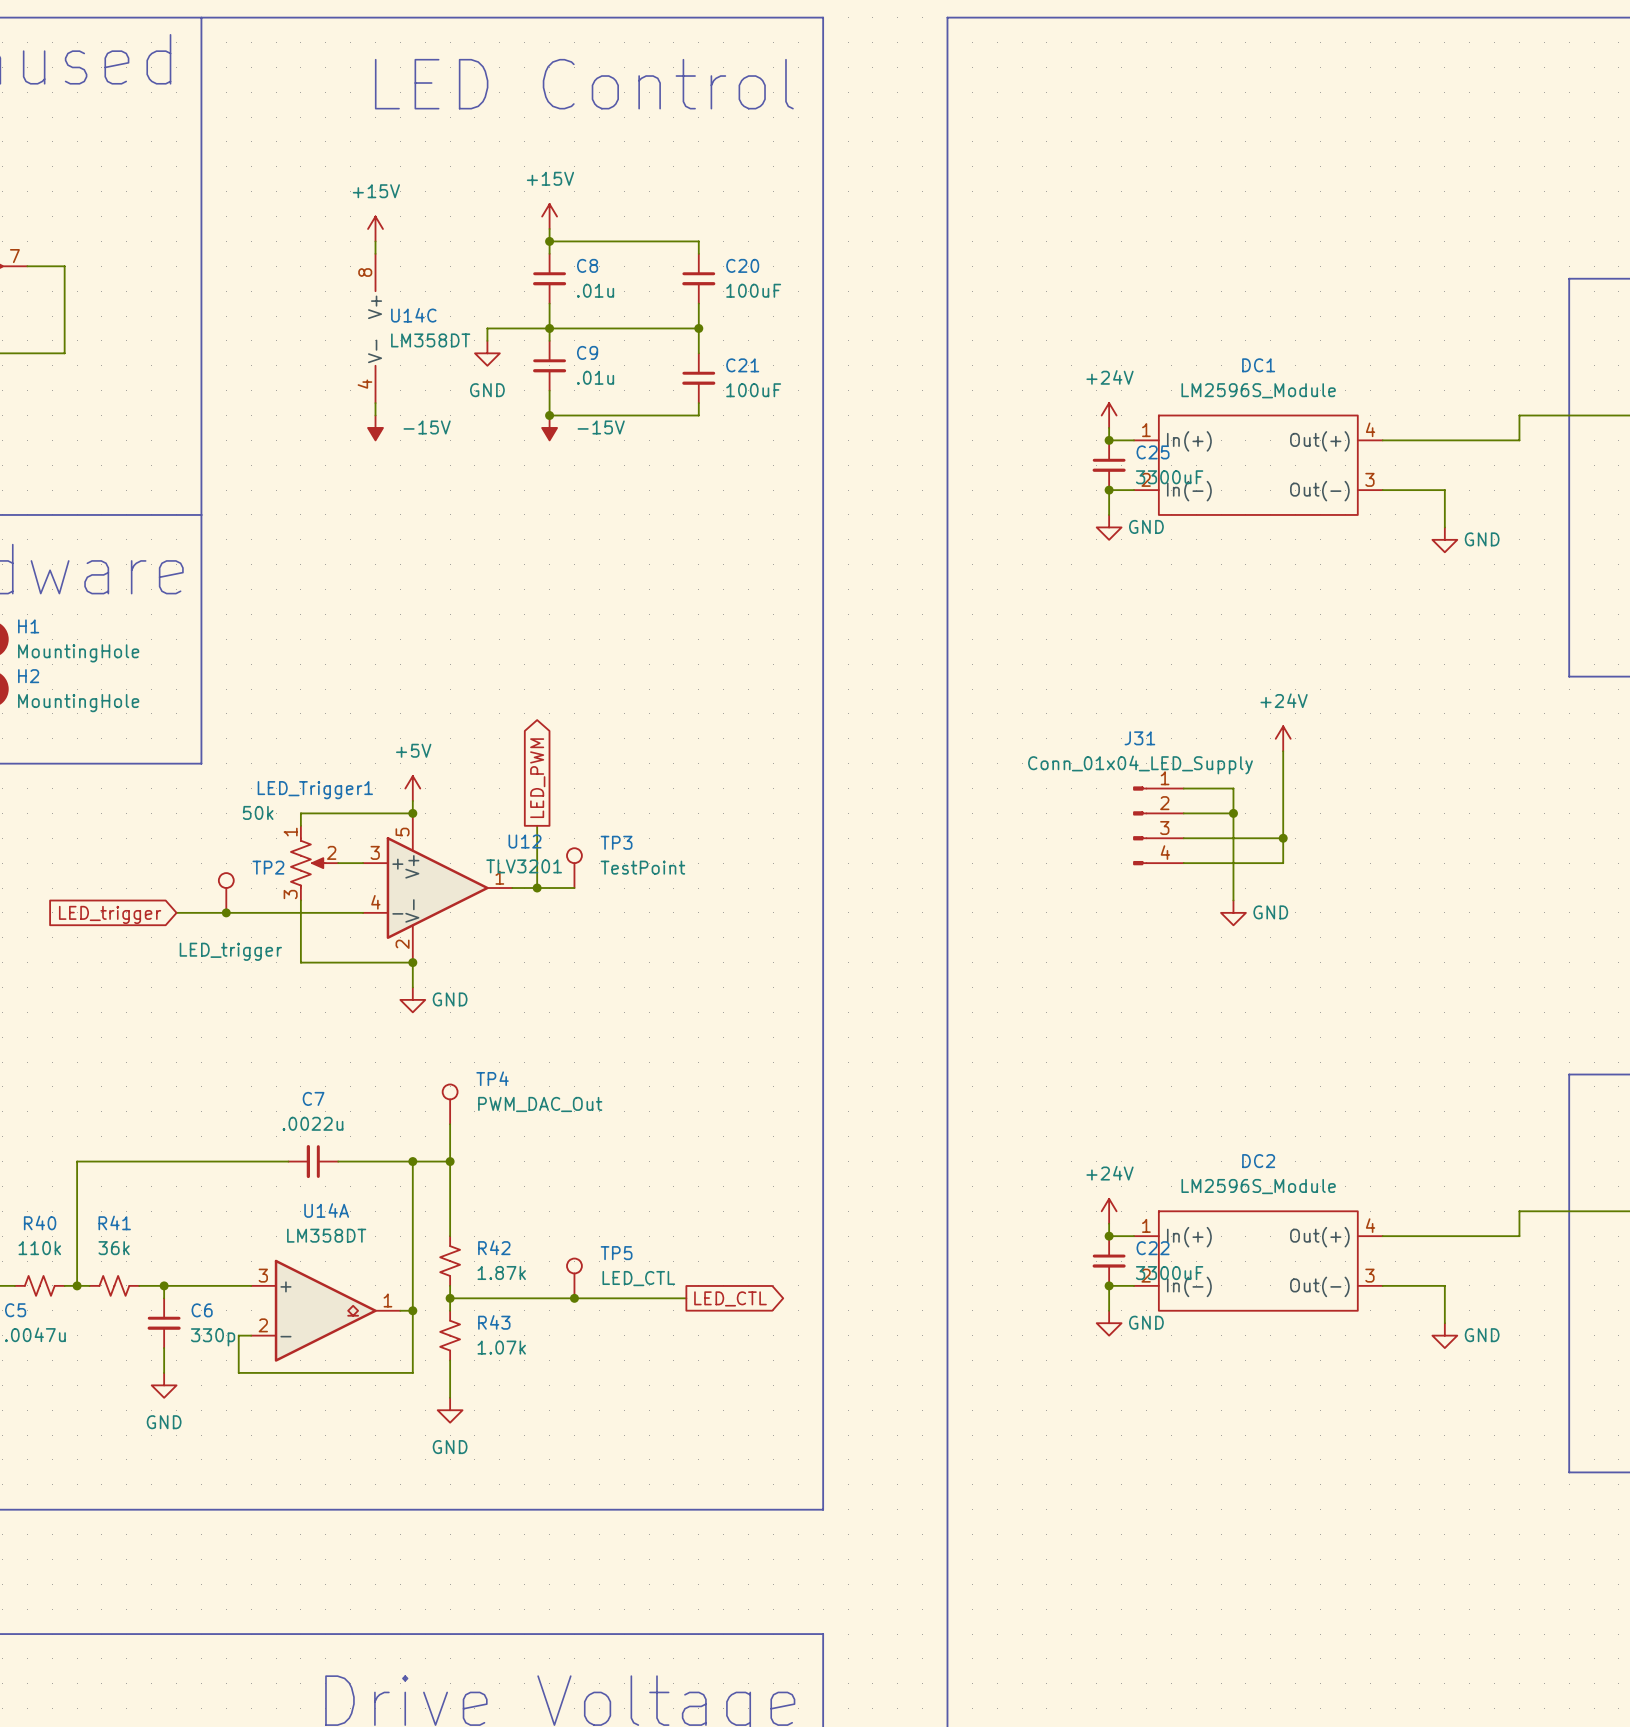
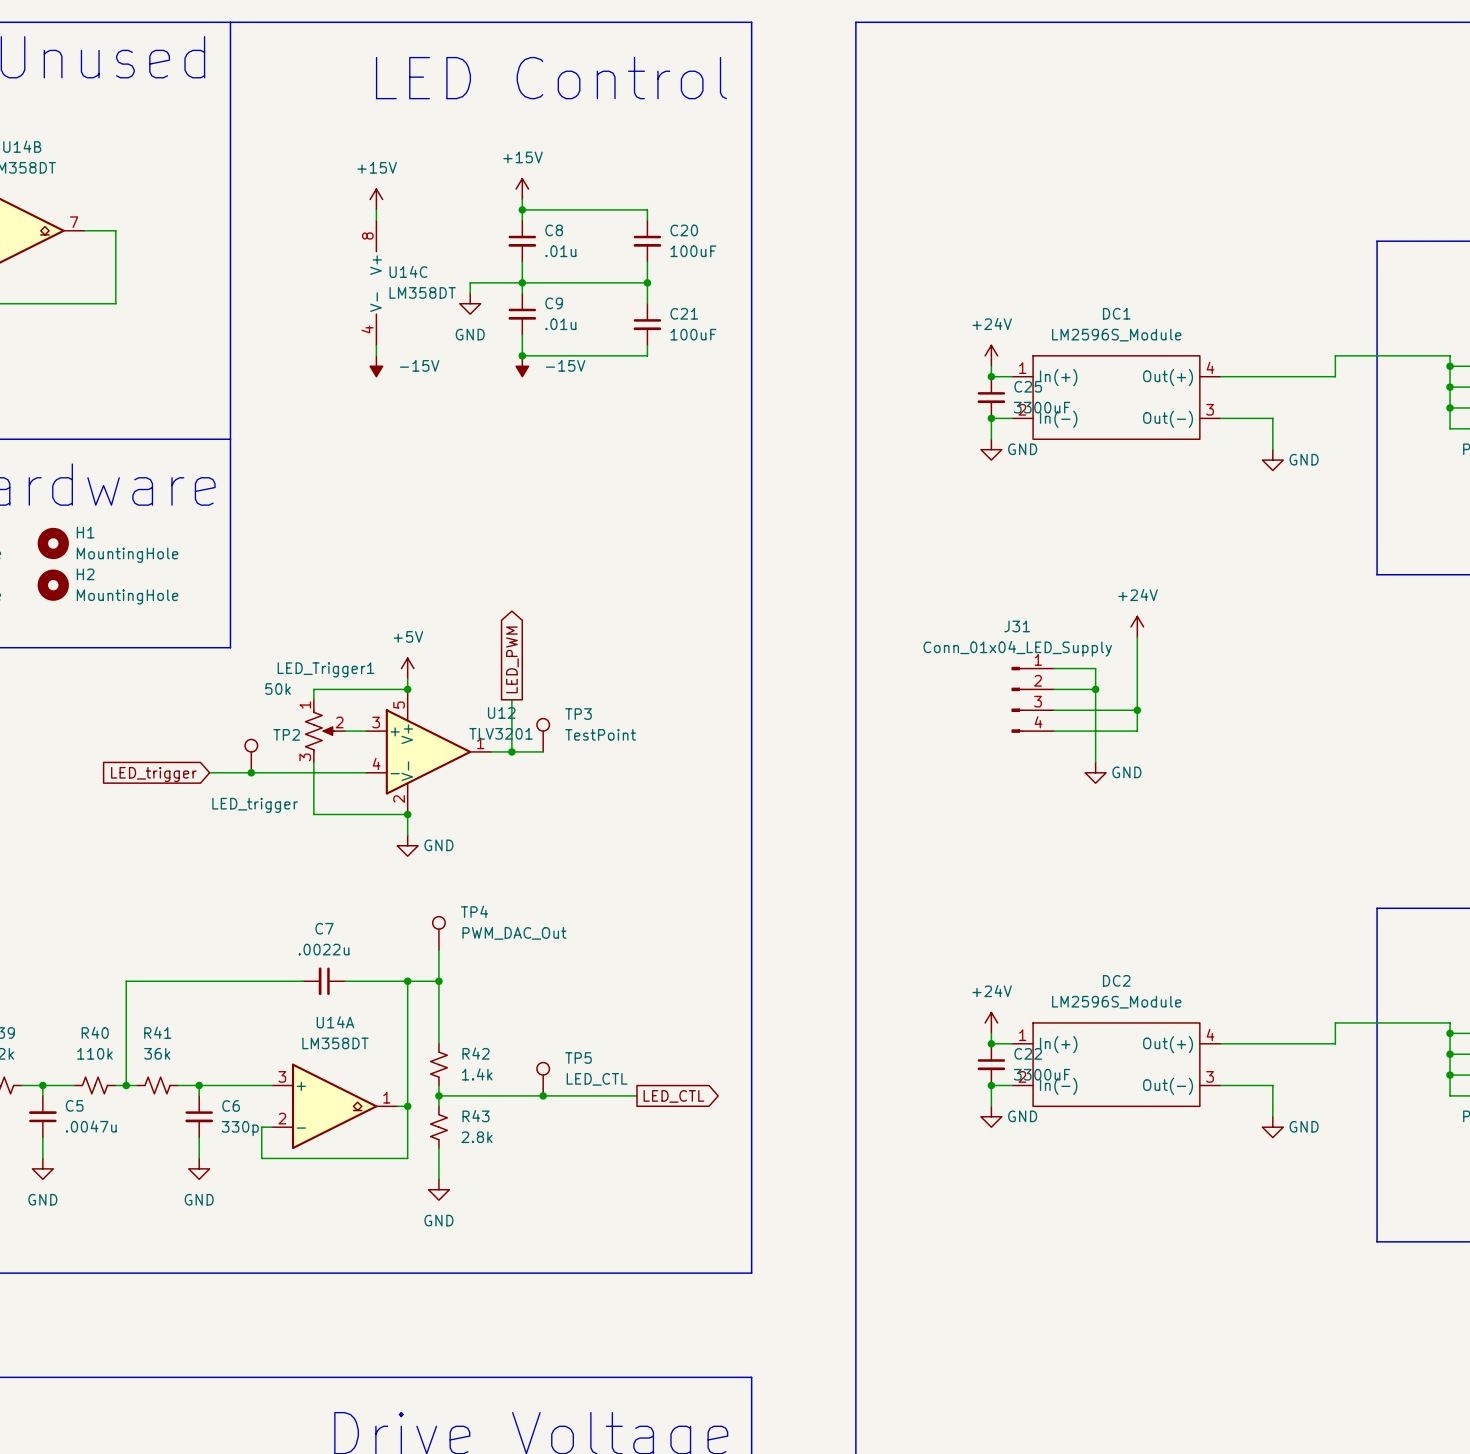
R42 value: 1.87k (501, 1272) -> 1.4k (477, 1074)
R43 value: 1.07k (501, 1347) -> 2.8k (476, 1137)

